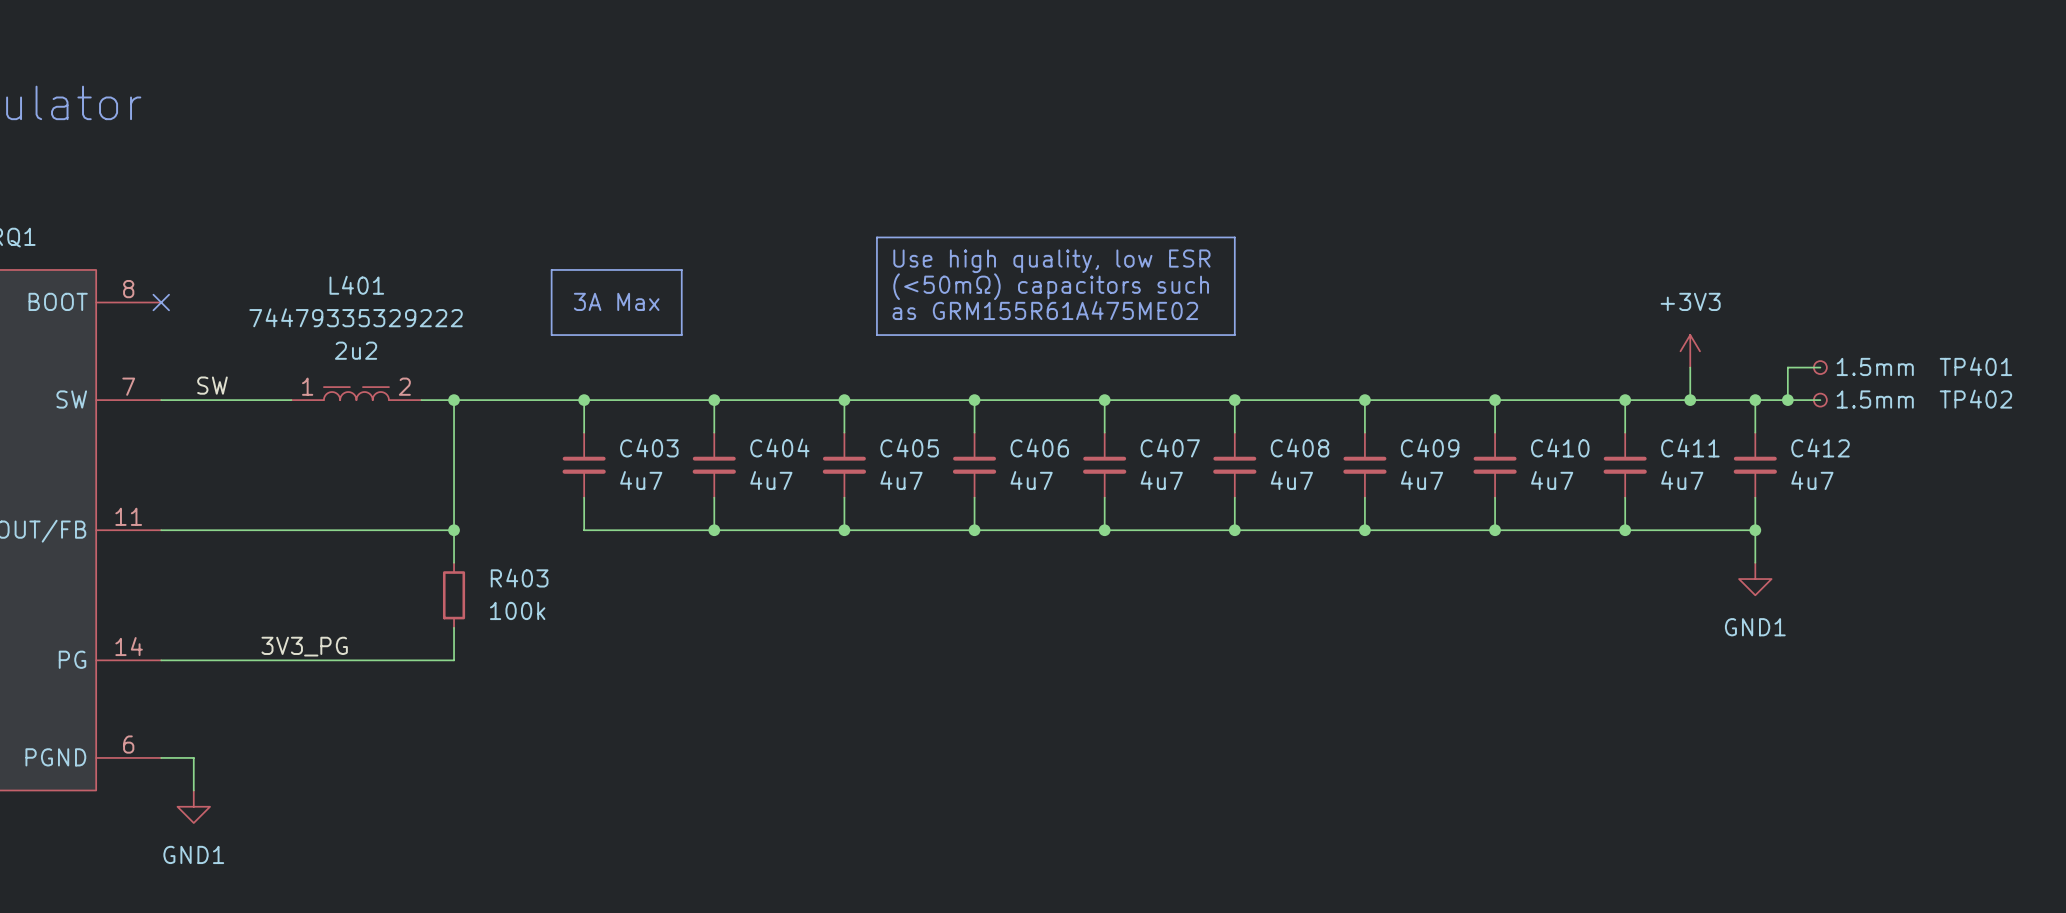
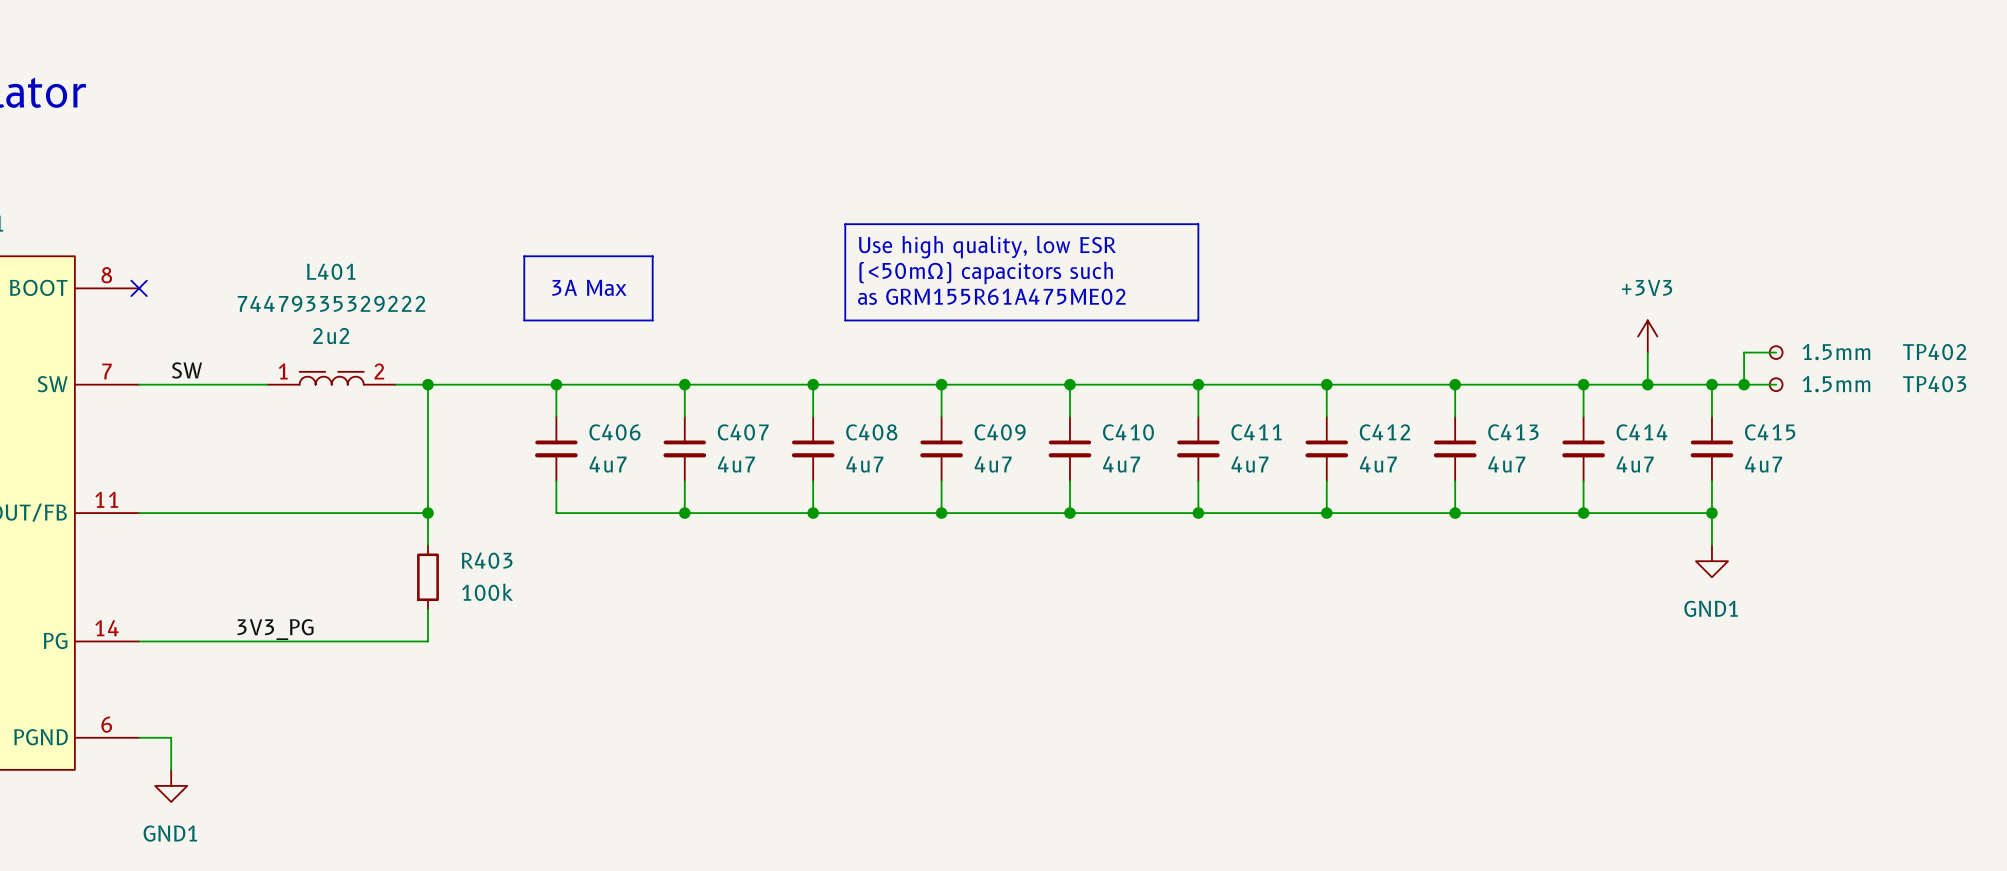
TP401 name: TP401 (1975, 366) -> TP402 (1934, 352)
TP402 name: TP402 (1975, 399) -> TP403 (1934, 384)
C403 name: C403 (649, 447) -> C406 (614, 432)
C404 name: C404 (779, 447) -> C407 (743, 432)
C405 name: C405 (909, 447) -> C408 (871, 432)
C406 name: C406 (1039, 447) -> C409 (1000, 432)
C407 name: C407 (1170, 447) -> C410 (1128, 432)
C408 name: C408 (1299, 447) -> C411 (1256, 432)
C409 name: C409 (1430, 447) -> C412 (1384, 432)
C410 name: C410 (1560, 447) -> C413 (1513, 432)
C411 name: C411 (1690, 447) -> C414 (1642, 432)
C412 name: C412 (1820, 447) -> C415 (1770, 432)

